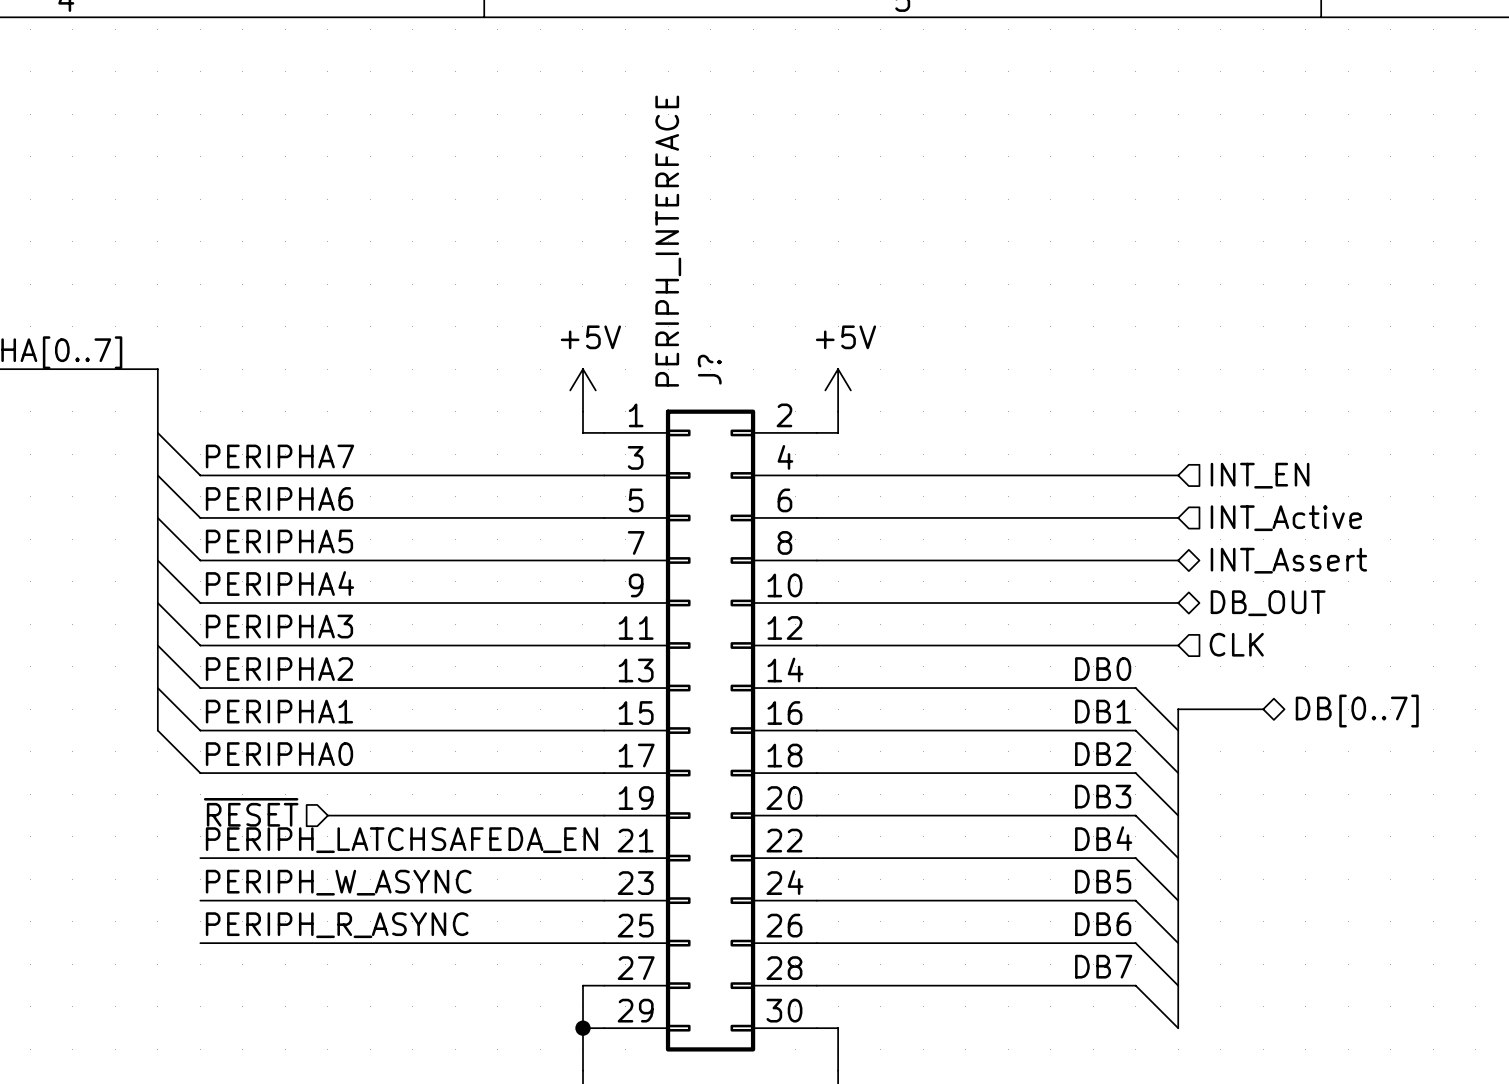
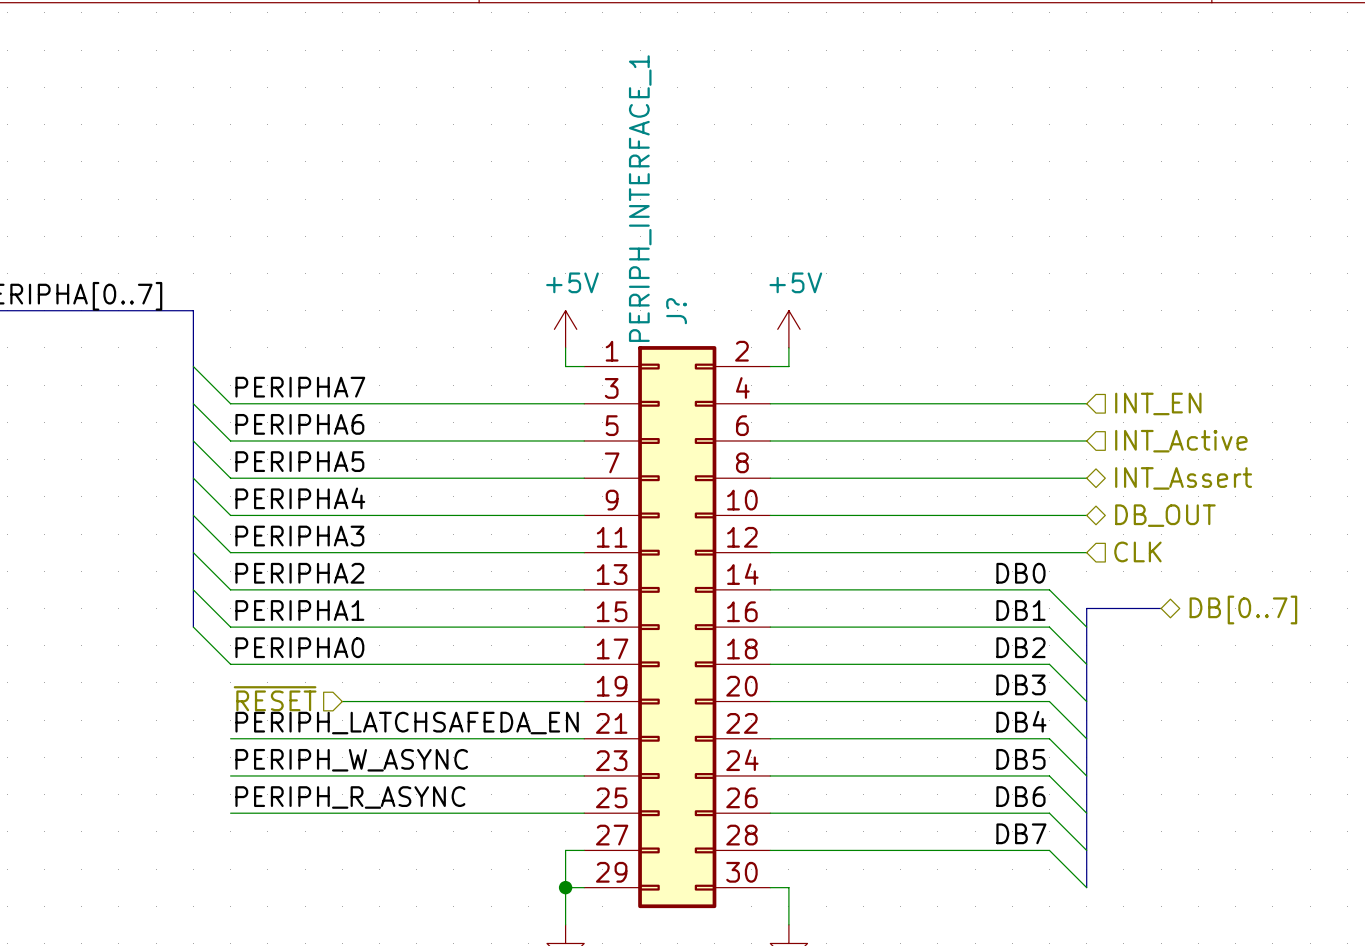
J? value: PERIPH_INTERFACE (668, 241) -> PERIPH_INTERFACE_1 (640, 198)

